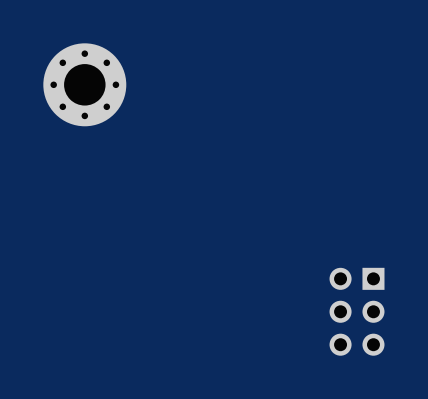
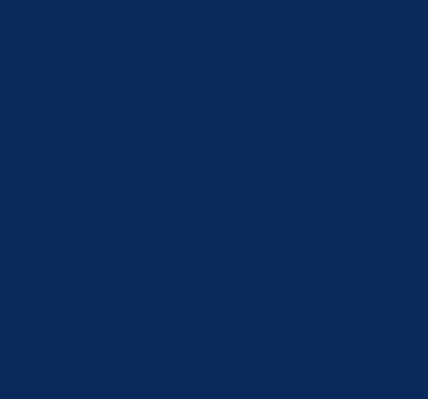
part: (84, 84) -> none
part: (357, 311) -> none

